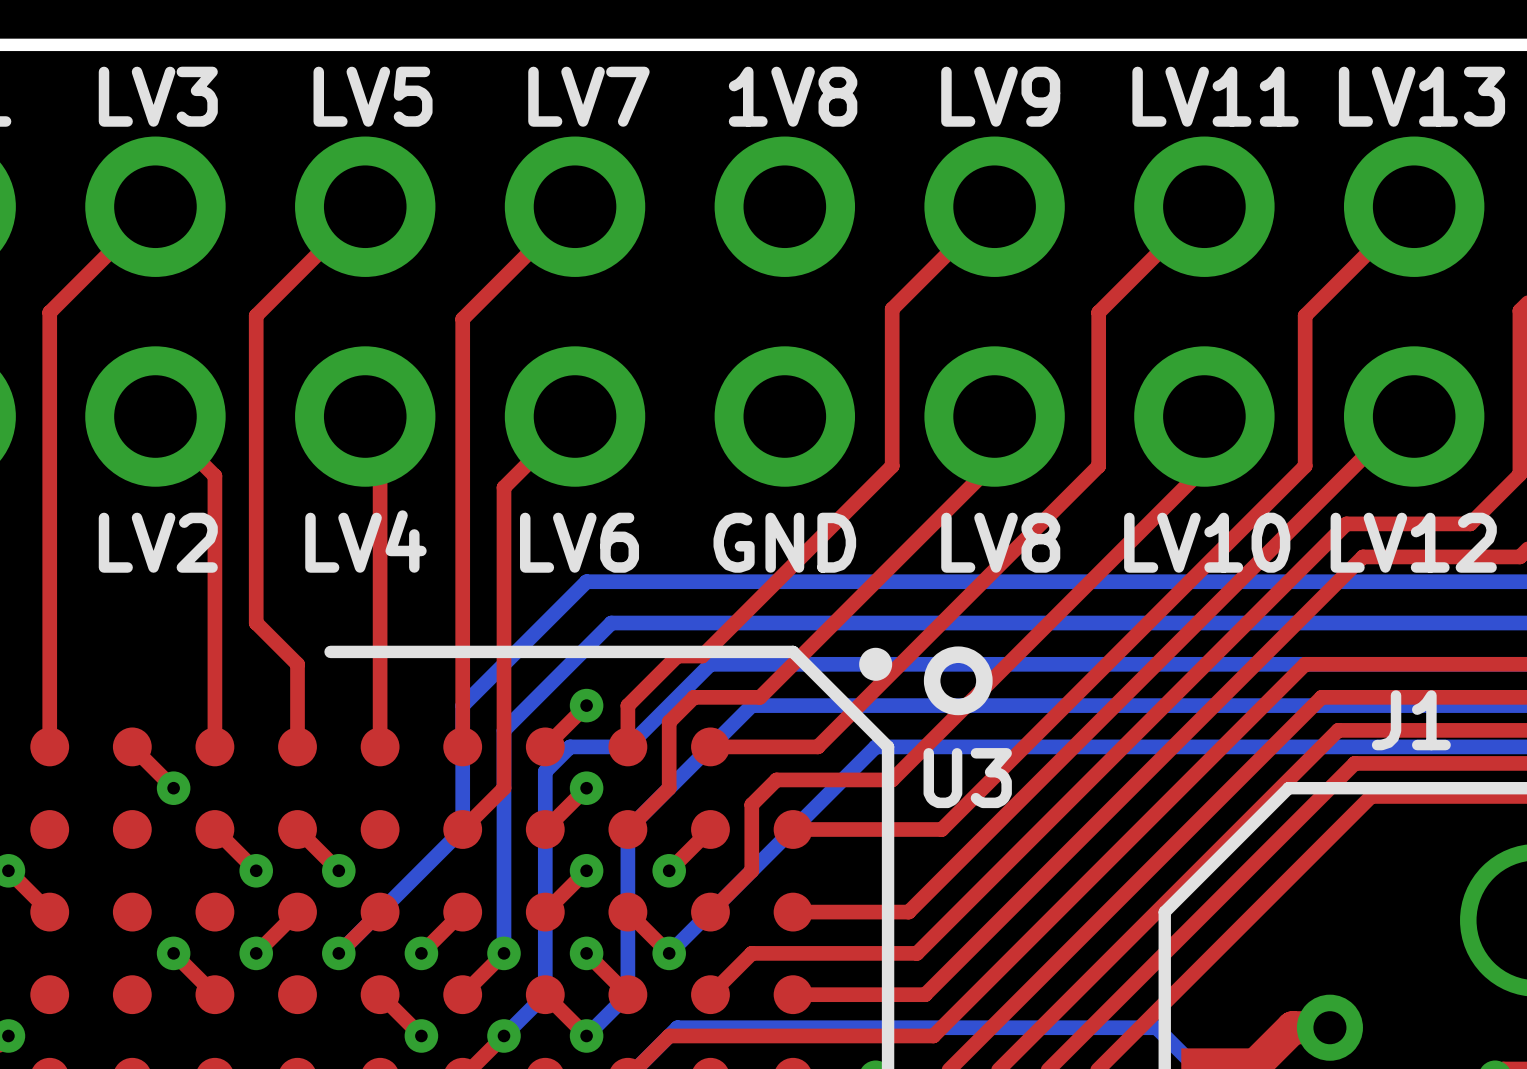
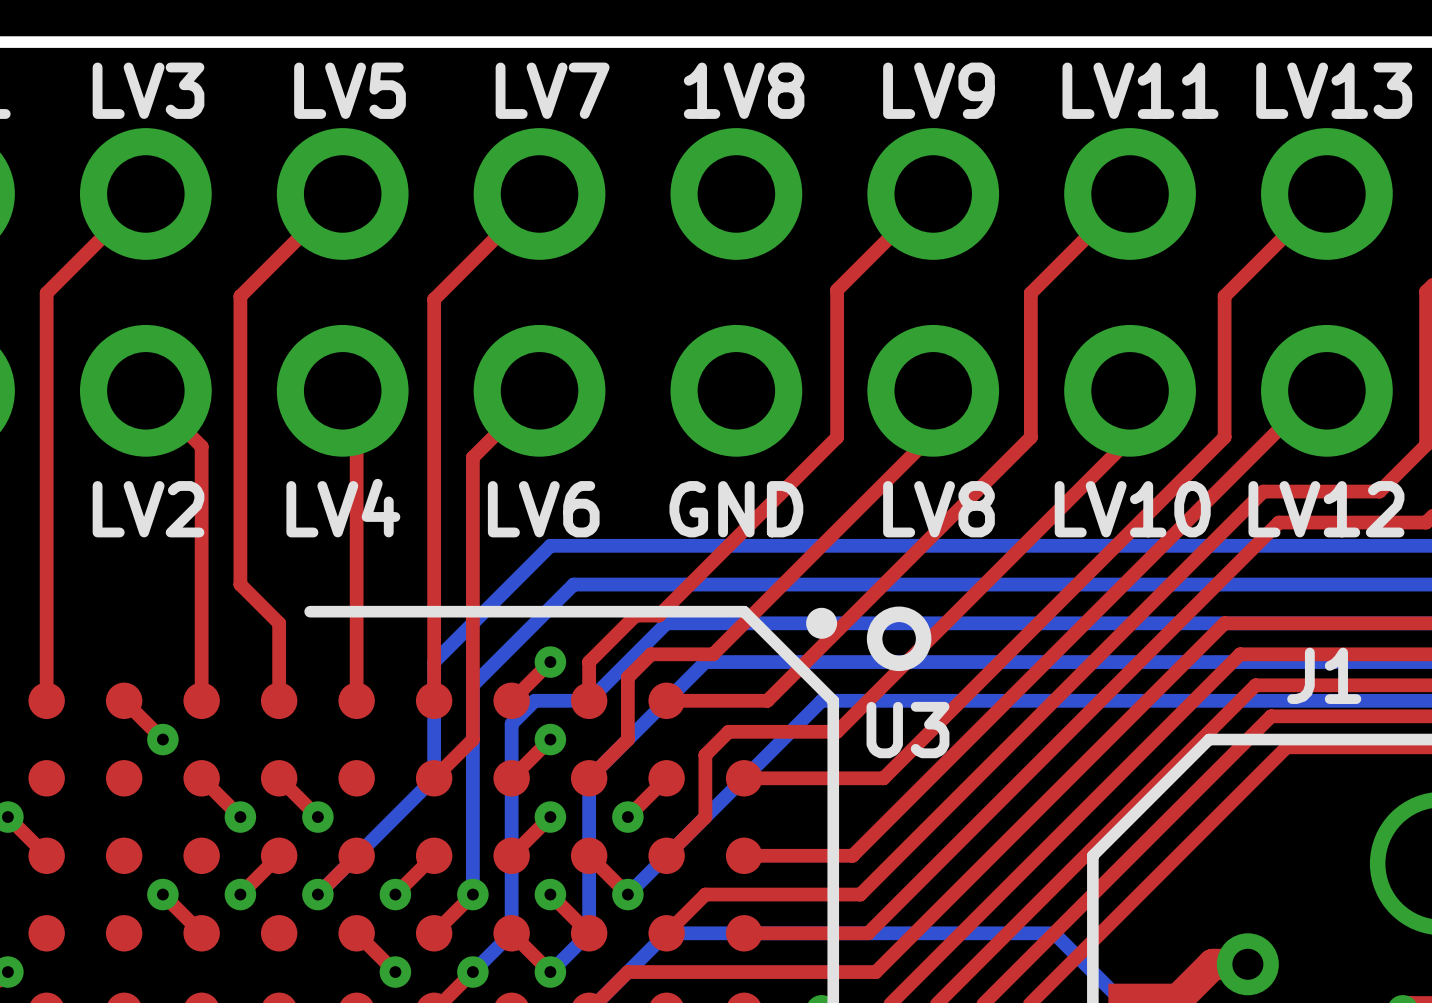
bottom track: (677, 1027) (1156, 1027) -> (635, 964) (666, 933) (1054, 933) (1085, 964)

